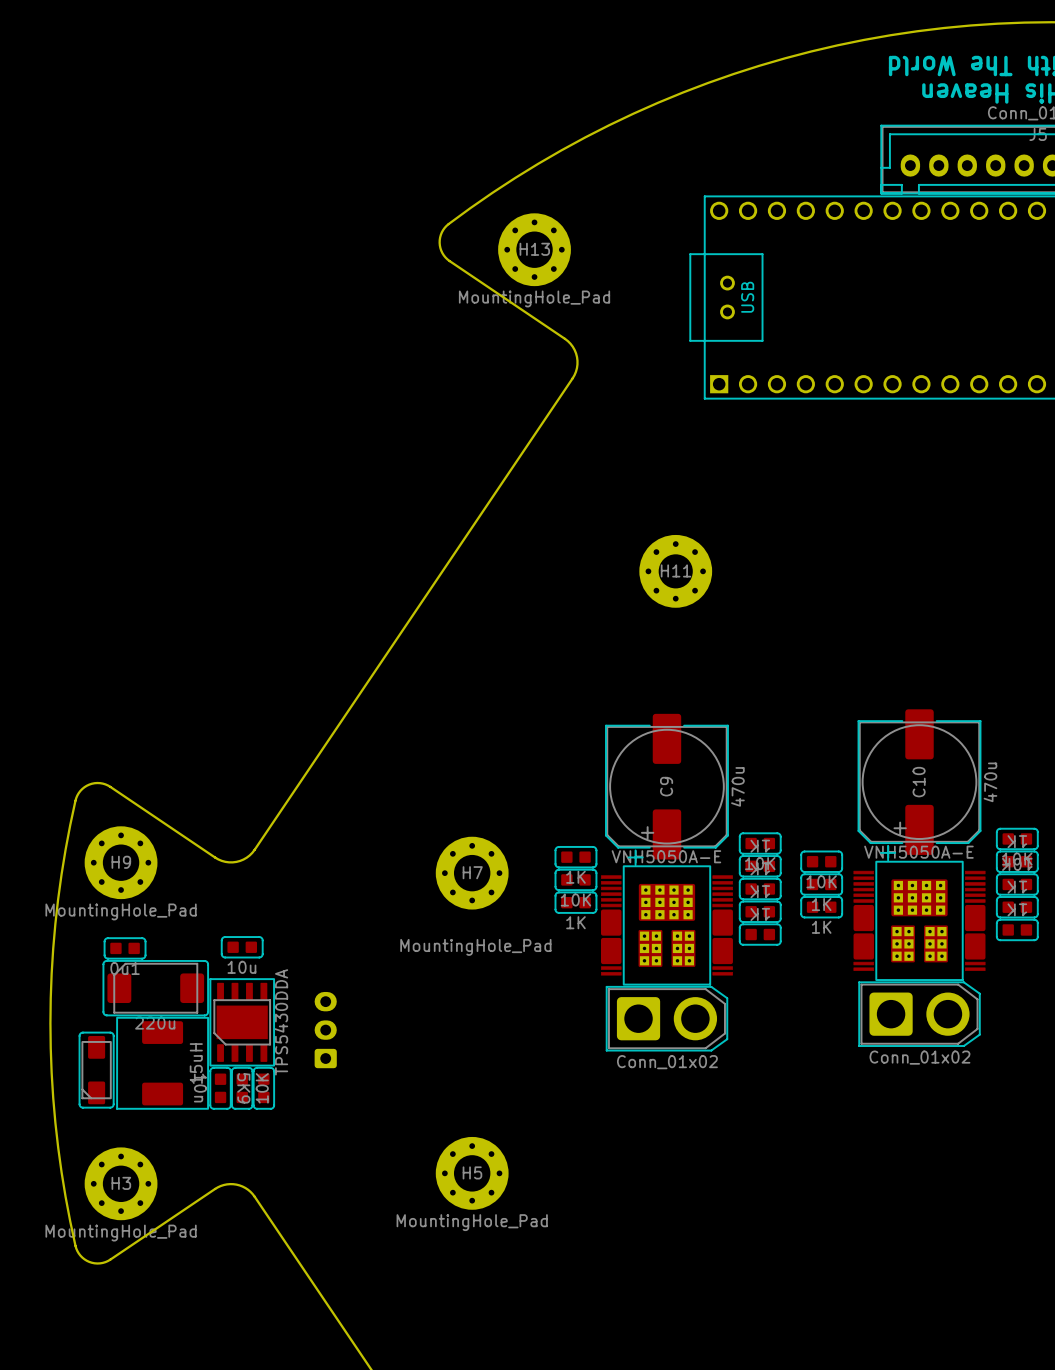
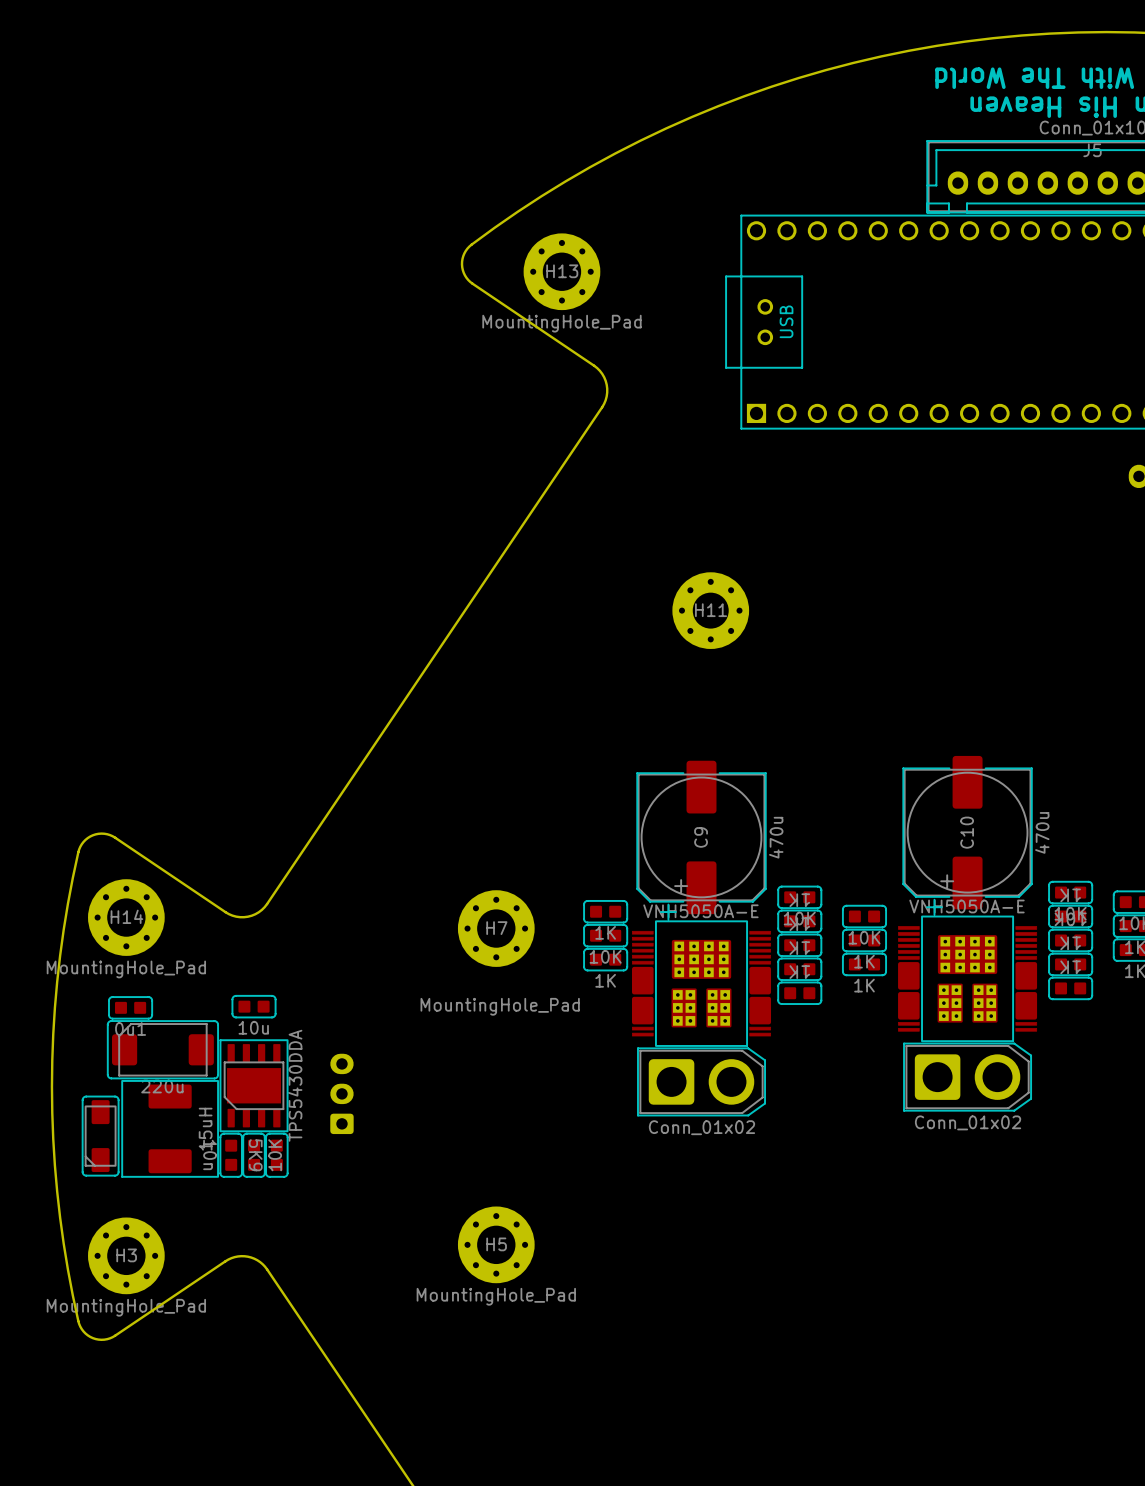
H9 name: H9 (121, 862) -> H14 (126, 916)

